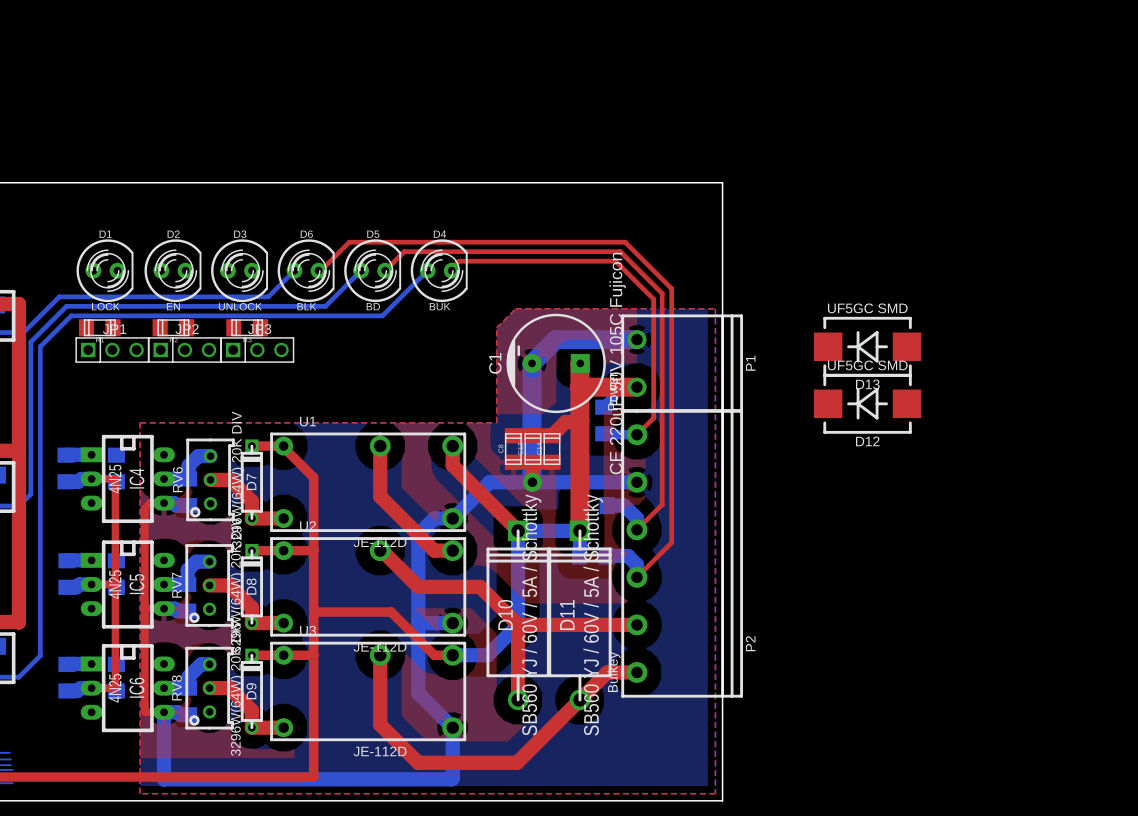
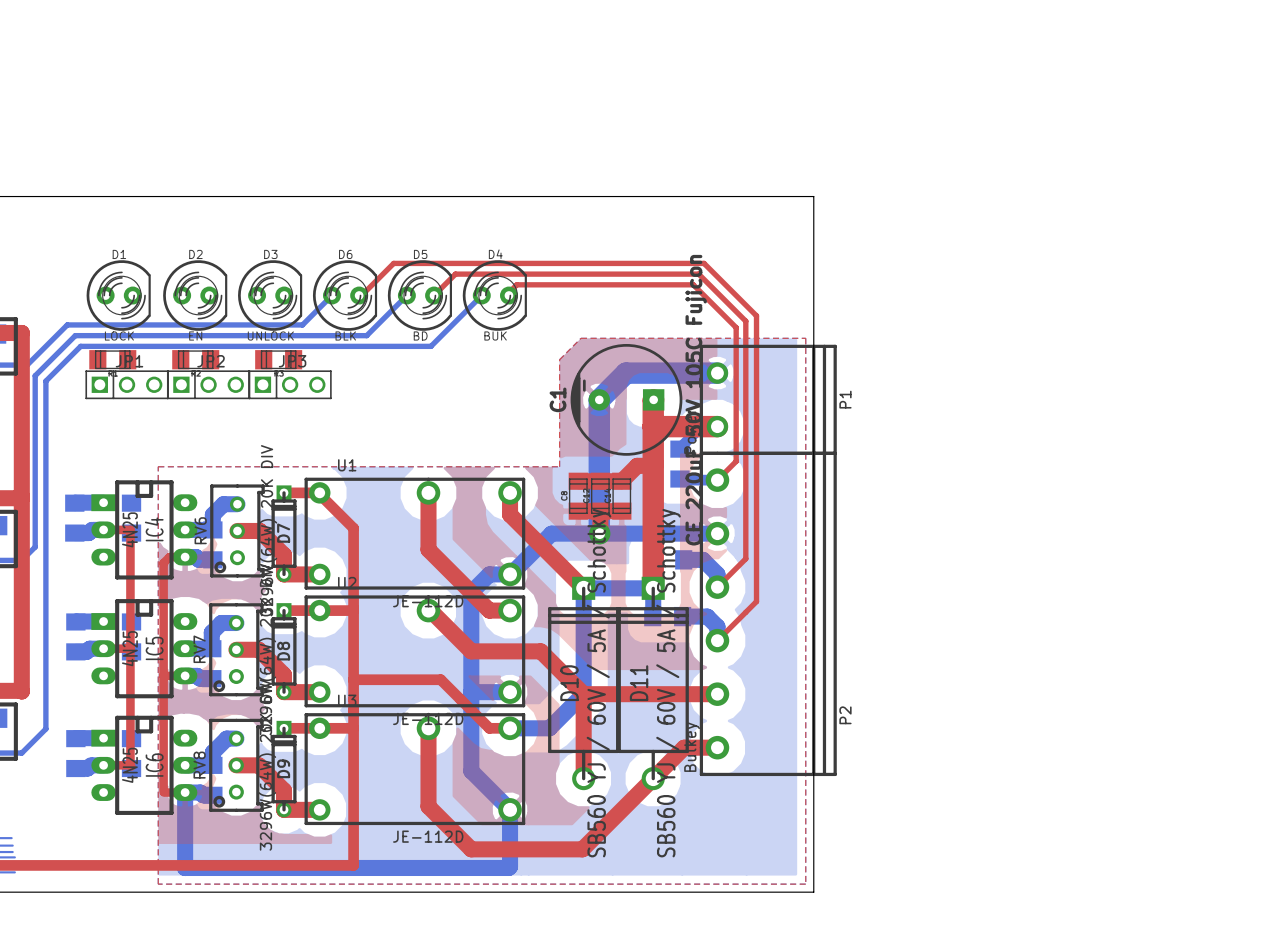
D13: UF5GC SMD (867, 346) -> none
D12: UF5GC SMD (867, 403) -> none

